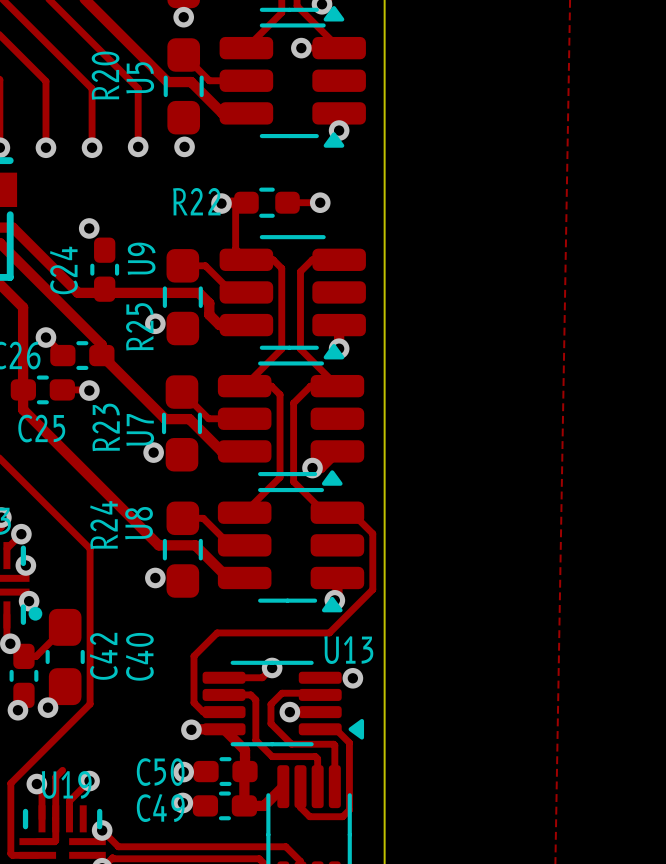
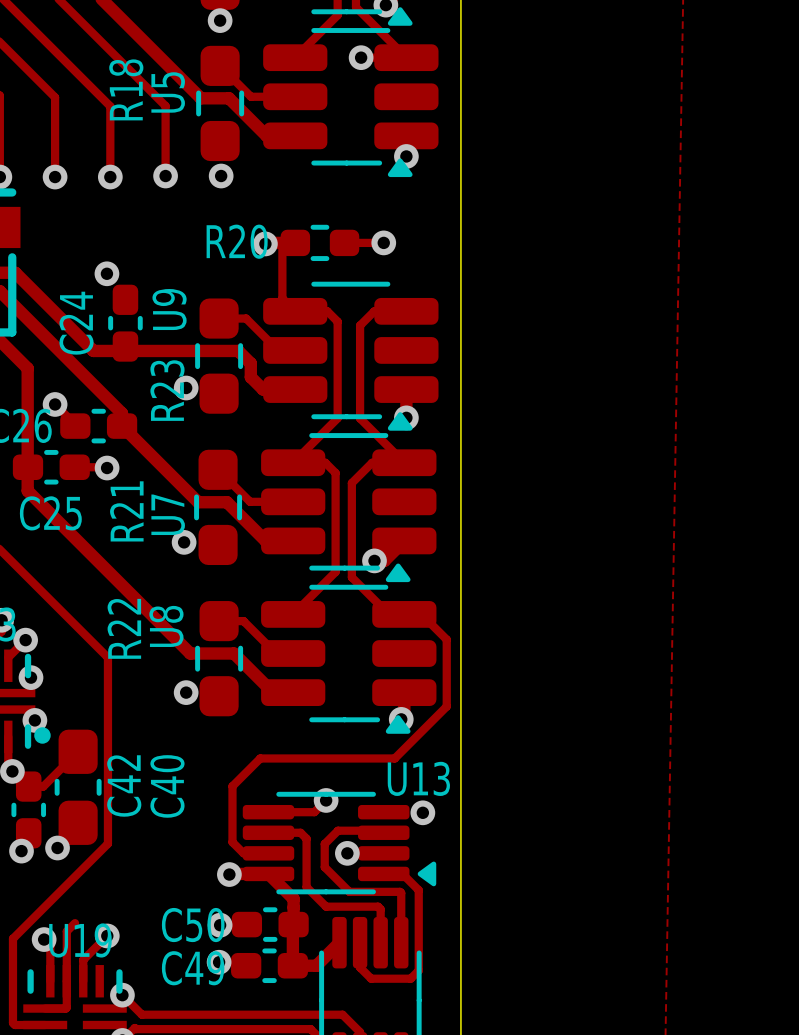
R20 name: R20 (105, 75) -> R18 (126, 89)
R22 name: R22 (196, 201) -> R20 (237, 241)
R25 name: R25 (139, 326) -> R23 (167, 390)
R23 name: R23 (106, 427) -> R21 (126, 511)
R24 name: R24 (104, 525) -> R22 (124, 628)

